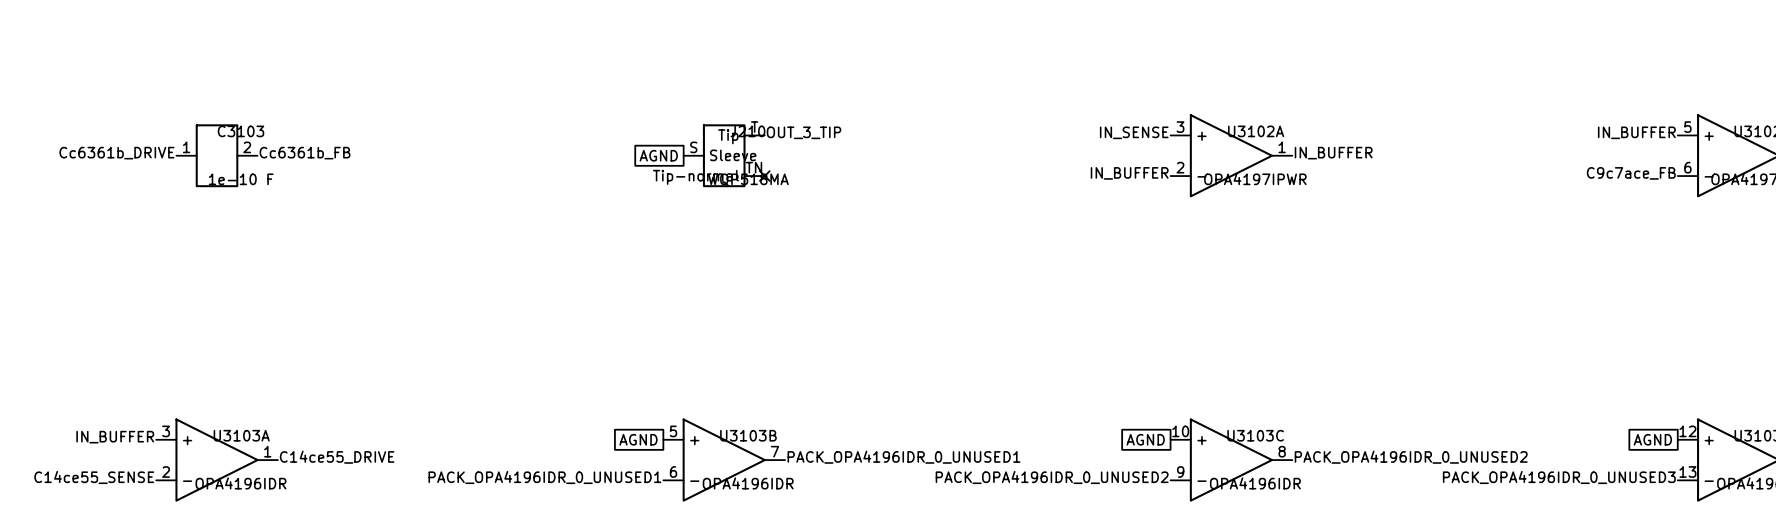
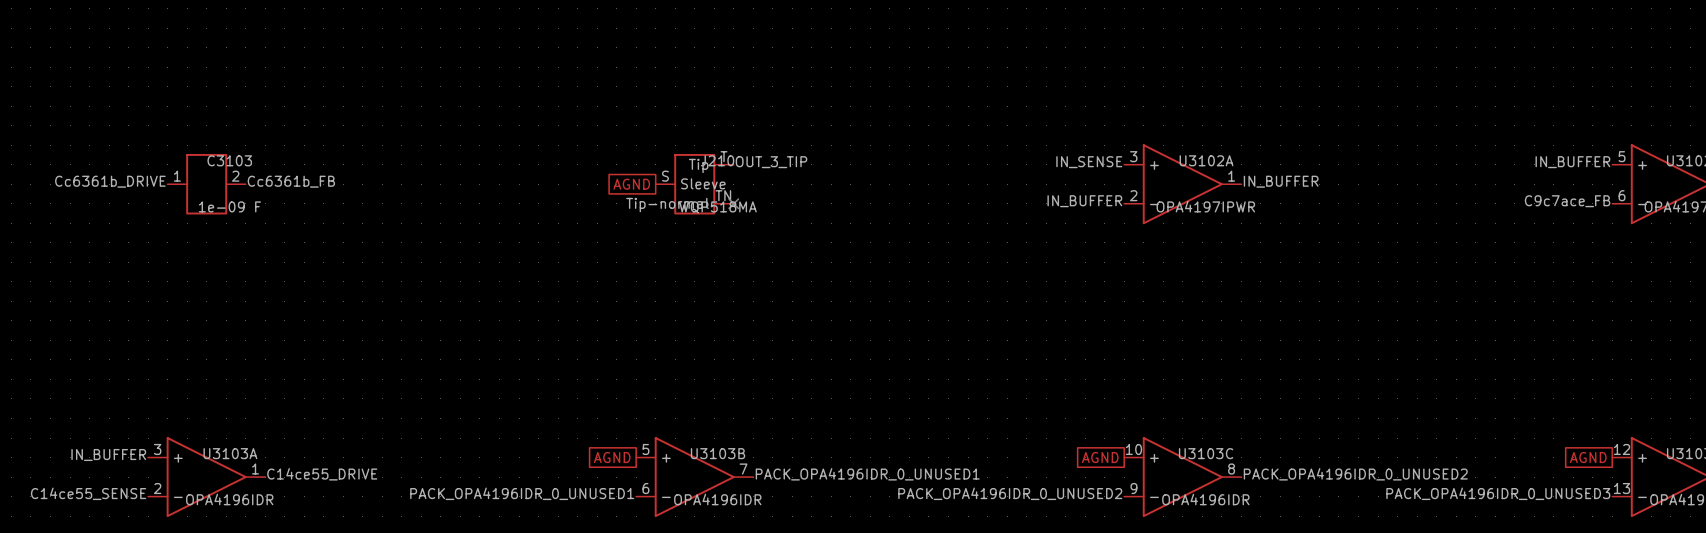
C3103 value: 1e-10 F (241, 179) -> 1e-09 F (229, 206)

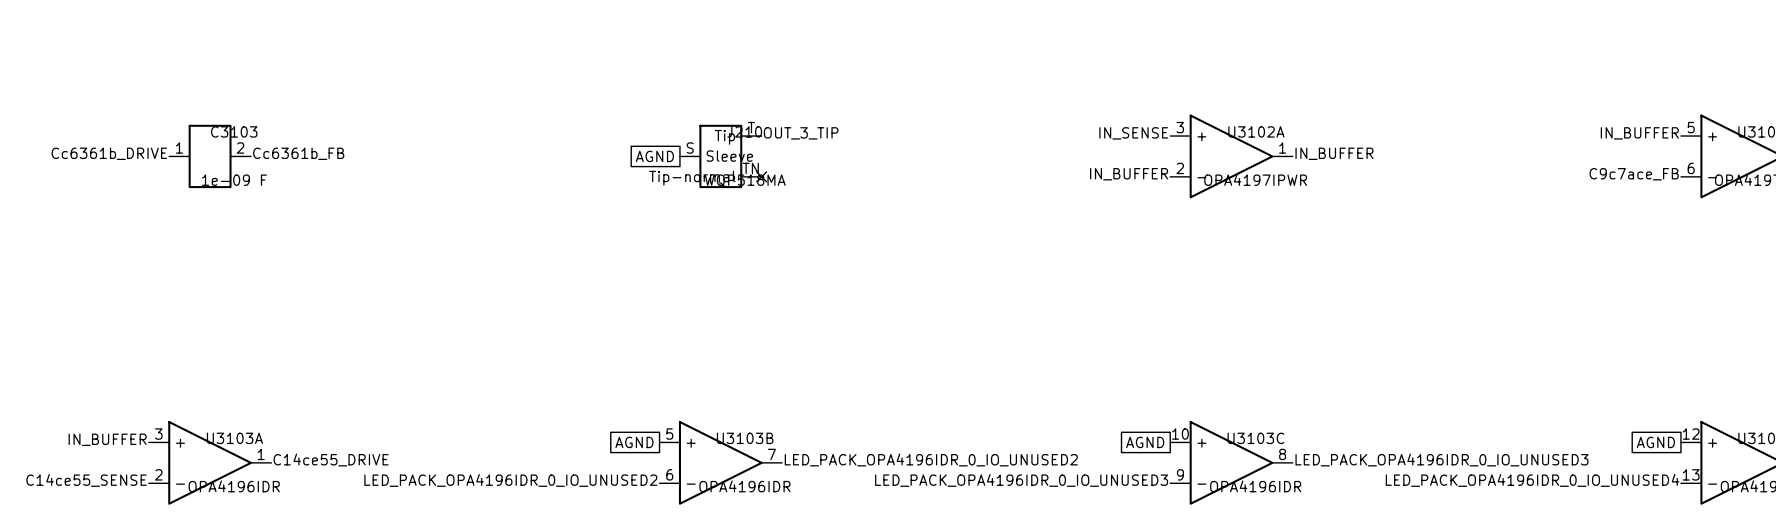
label: PACK_OPA4196IDR_0_UNUSED1 (867, 474) -> LED_PACK_OPA4196IDR_0_IO_UNUSED2 (931, 459)
label: PACK_OPA4196IDR_0_UNUSED2 (1355, 474) -> LED_PACK_OPA4196IDR_0_IO_UNUSED3 (1441, 459)
label: PACK_OPA4196IDR_0_UNUSED1 (522, 493) -> LED_PACK_OPA4196IDR_0_IO_UNUSED2 (510, 480)
label: PACK_OPA4196IDR_0_UNUSED2 (1010, 493) -> LED_PACK_OPA4196IDR_0_IO_UNUSED3 (1021, 480)
label: PACK_OPA4196IDR_0_UNUSED3 (1498, 493) -> LED_PACK_OPA4196IDR_0_IO_UNUSED4 (1532, 480)

